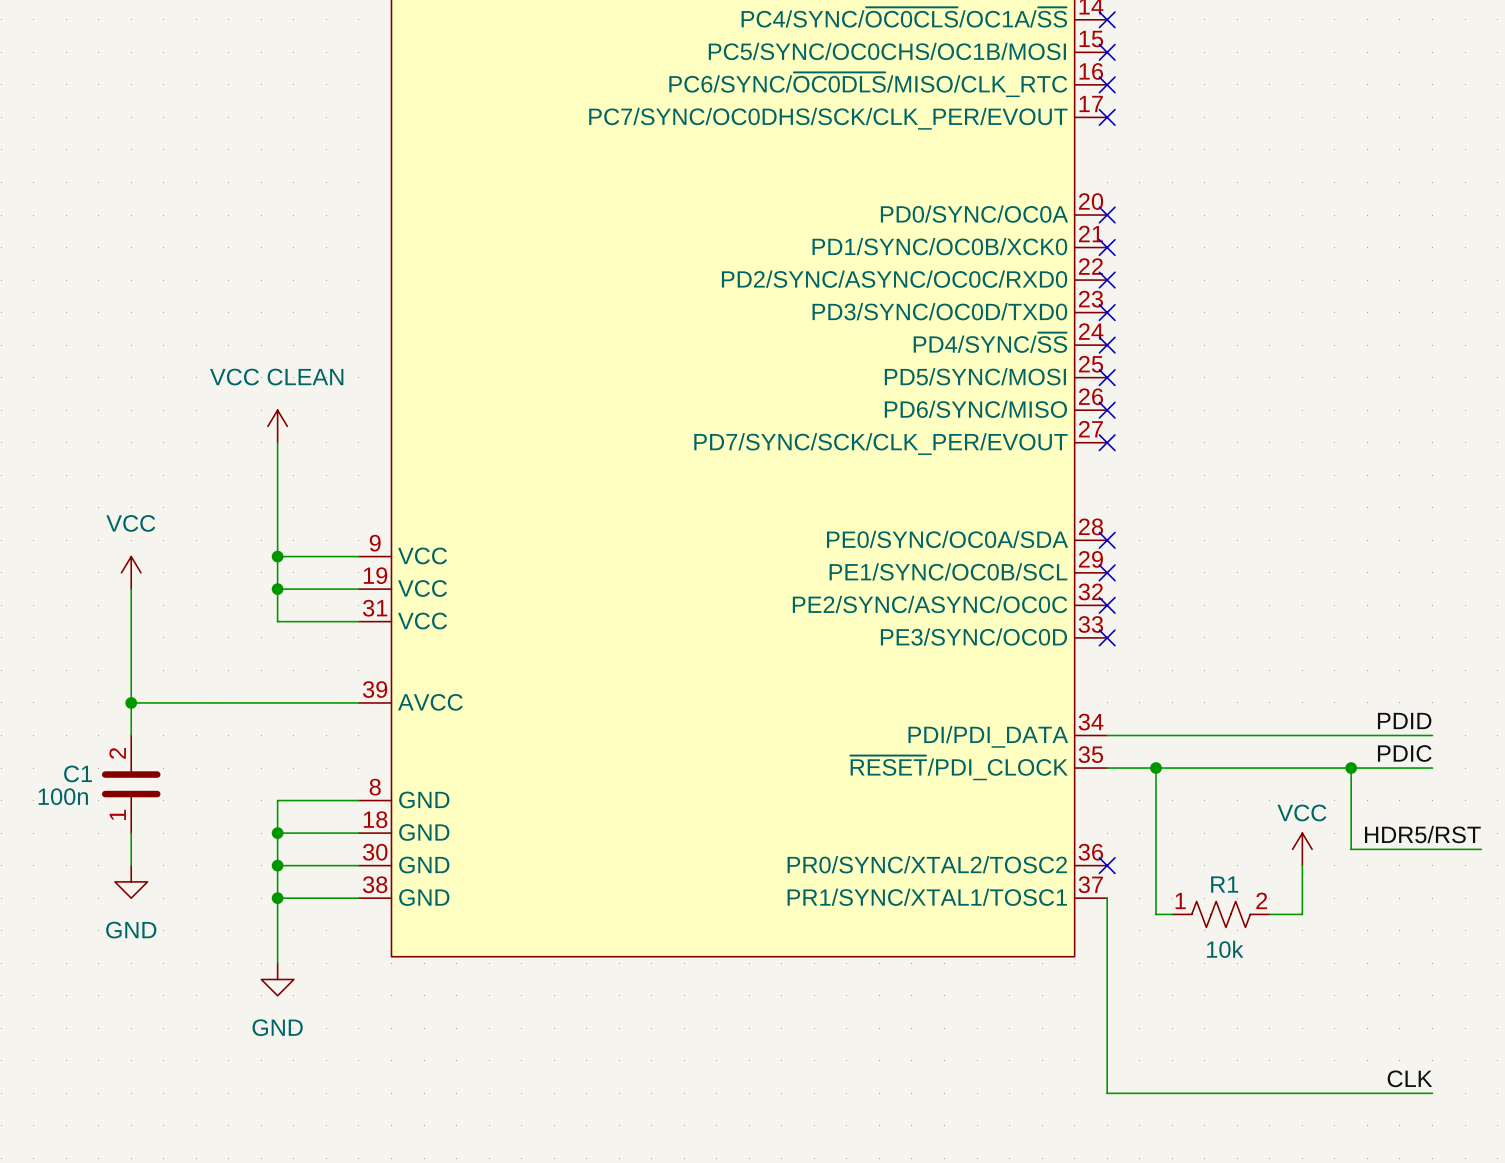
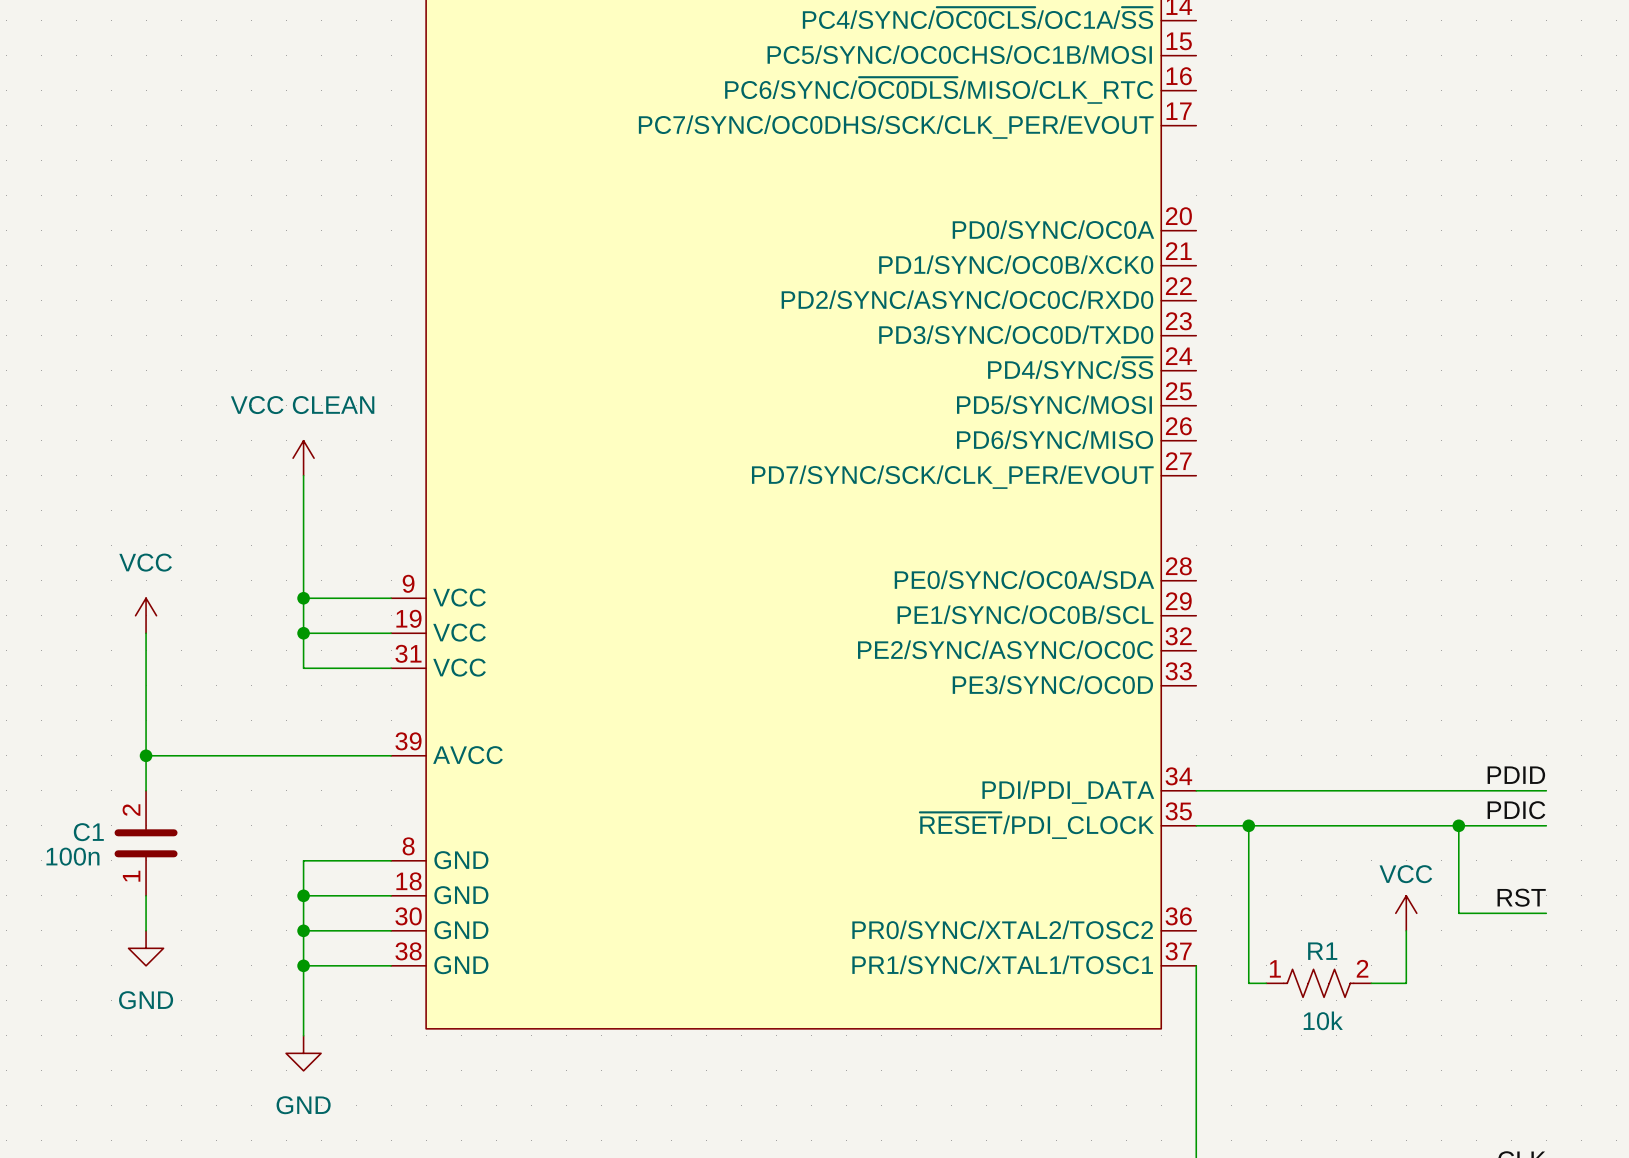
no-connect mark: (1107, 19) -> none
no-connect mark: (1107, 52) -> none
no-connect mark: (1107, 84) -> none
no-connect mark: (1107, 117) -> none
no-connect mark: (1107, 215) -> none
no-connect mark: (1107, 247) -> none
no-connect mark: (1107, 280) -> none
no-connect mark: (1107, 312) -> none
no-connect mark: (1107, 345) -> none
no-connect mark: (1107, 377) -> none
no-connect mark: (1107, 410) -> none
no-connect mark: (1107, 442) -> none
no-connect mark: (1107, 540) -> none
no-connect mark: (1107, 572) -> none
no-connect mark: (1107, 605) -> none
no-connect mark: (1107, 637) -> none
label: none -> RST (1521, 897)
label: HDR5/RST (1422, 834) -> none
wire: (1432, 849) (1481, 849) -> none
no-connect mark: (1107, 865) -> none

